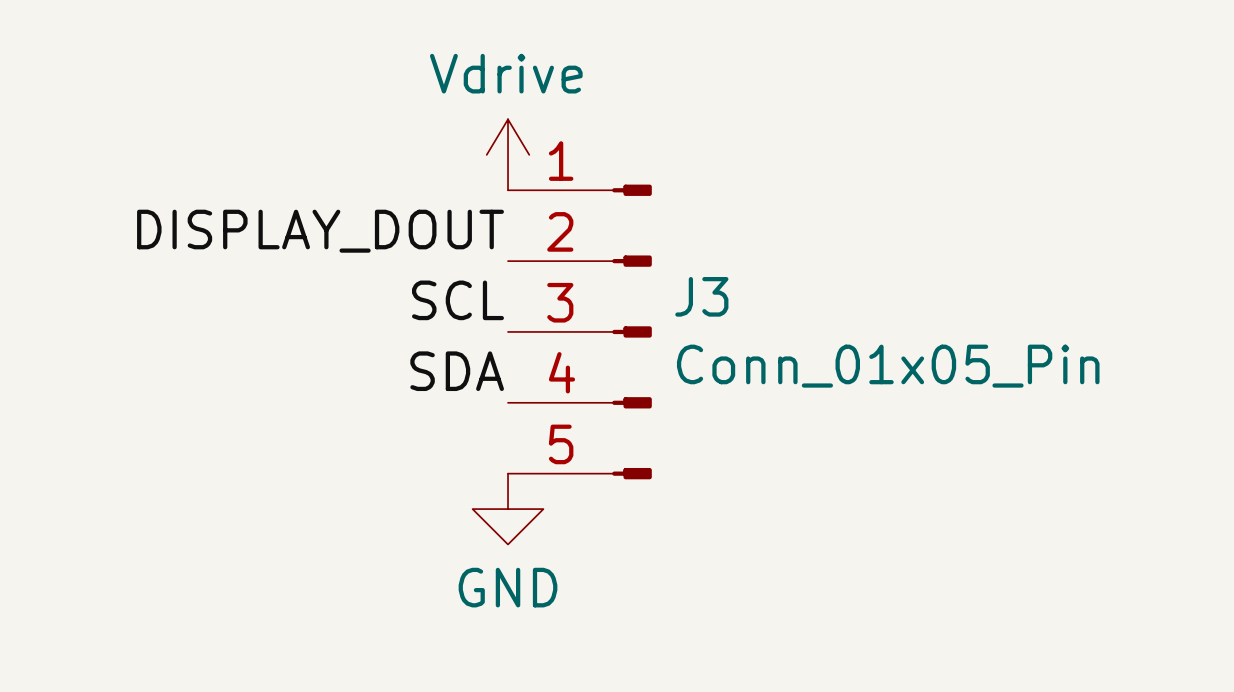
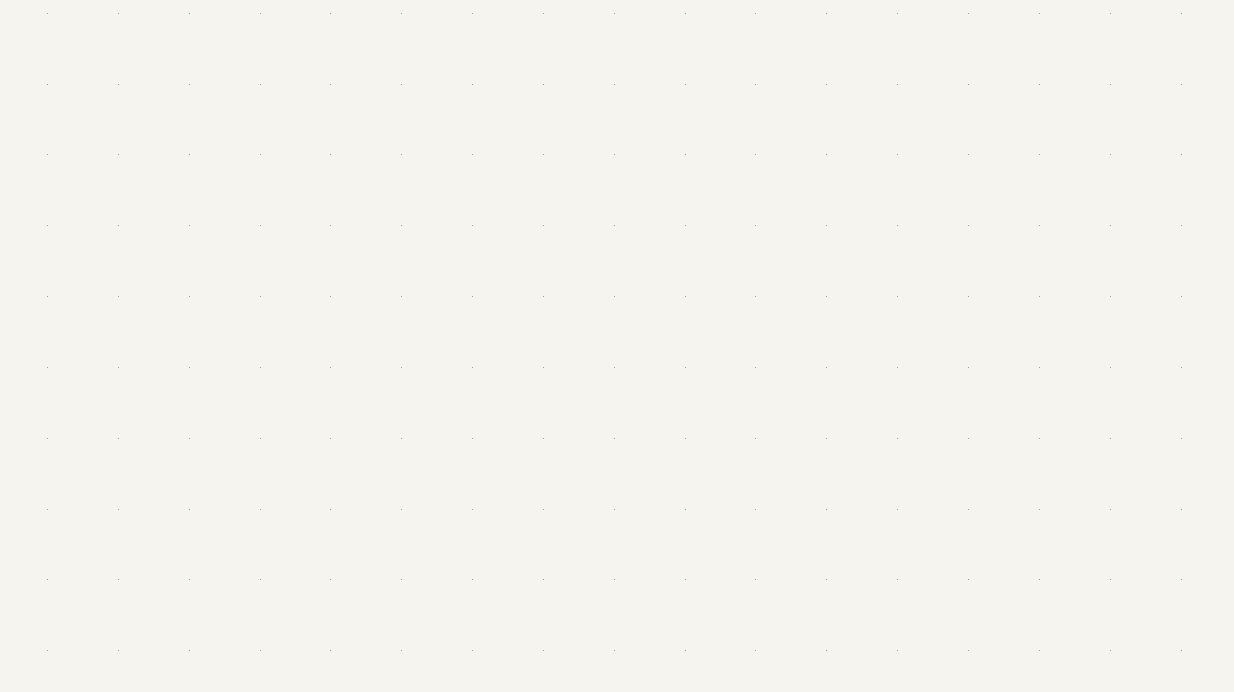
power symbol: Vdrive (508, 154) -> none
label: DISPLAY_DOUT (320, 231) -> none
label: SCL (457, 300) -> none
J3: Conn_01x05_Pin (579, 331) -> none
label: SDA (457, 371) -> none
power symbol: GND (508, 509) -> none

